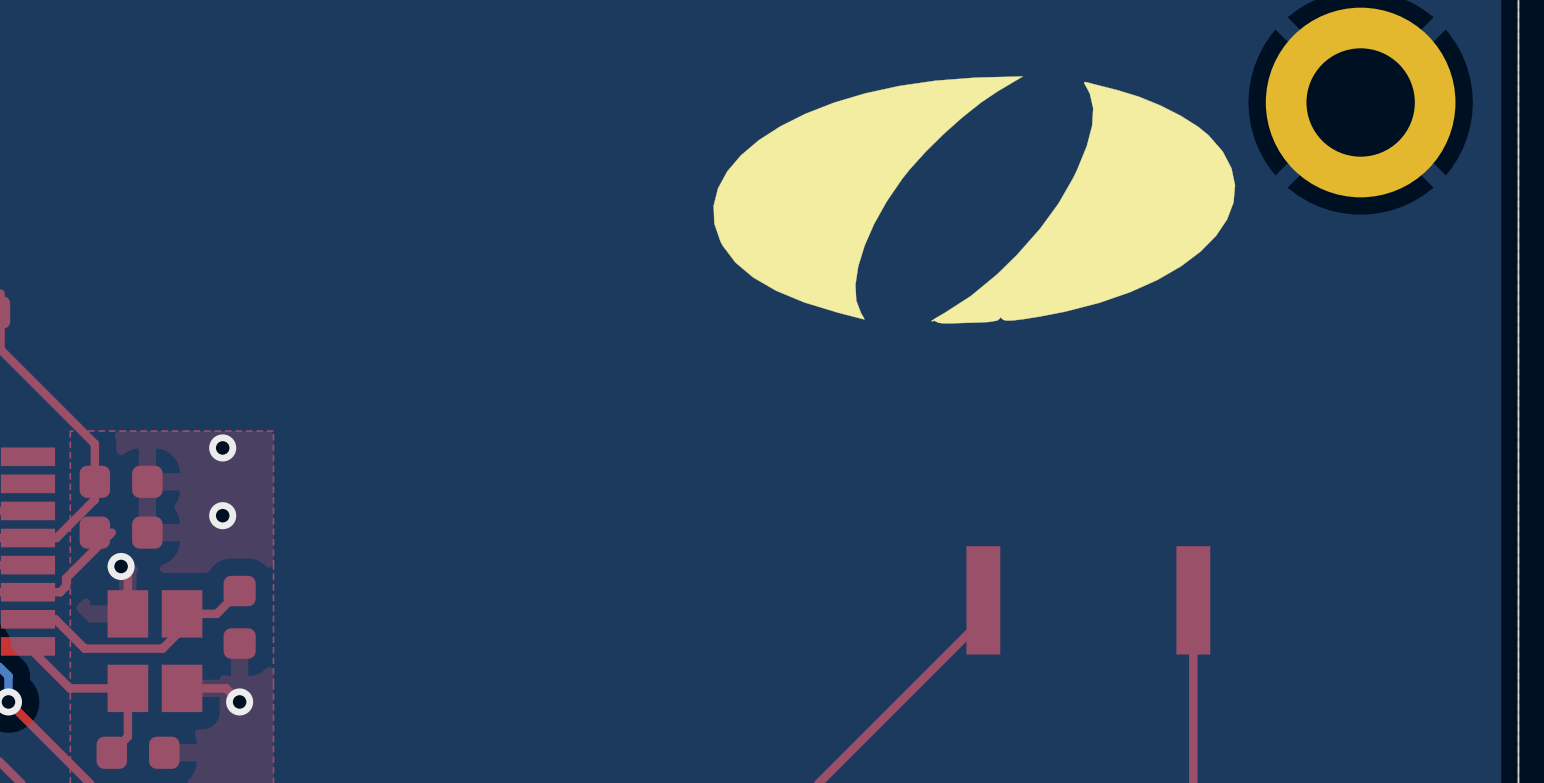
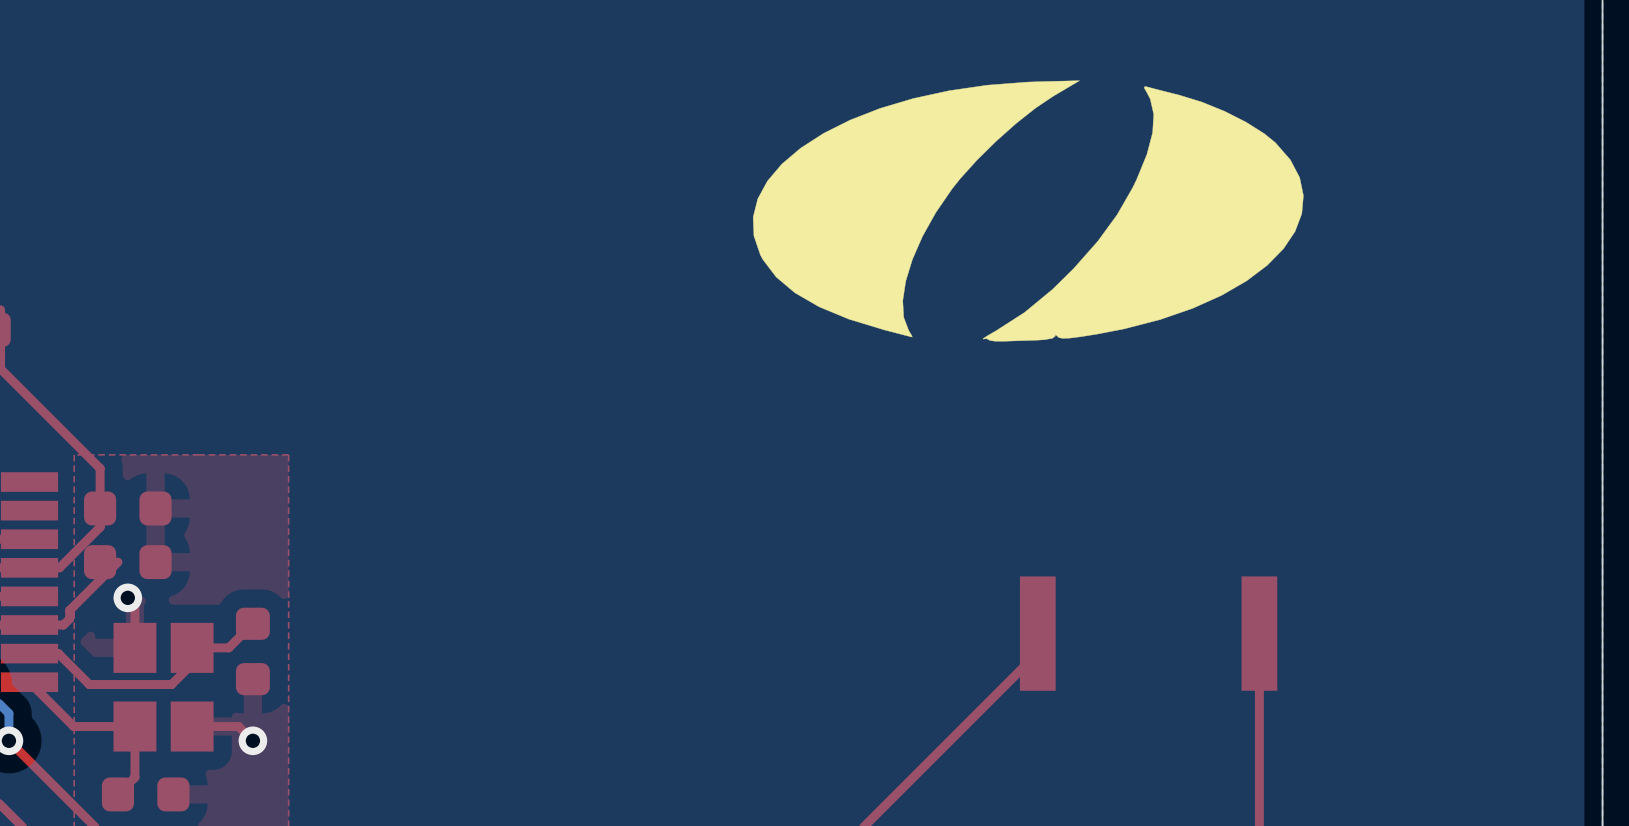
part: (1360, 102) -> none
via: (222, 447) -> none
via: (222, 515) -> none

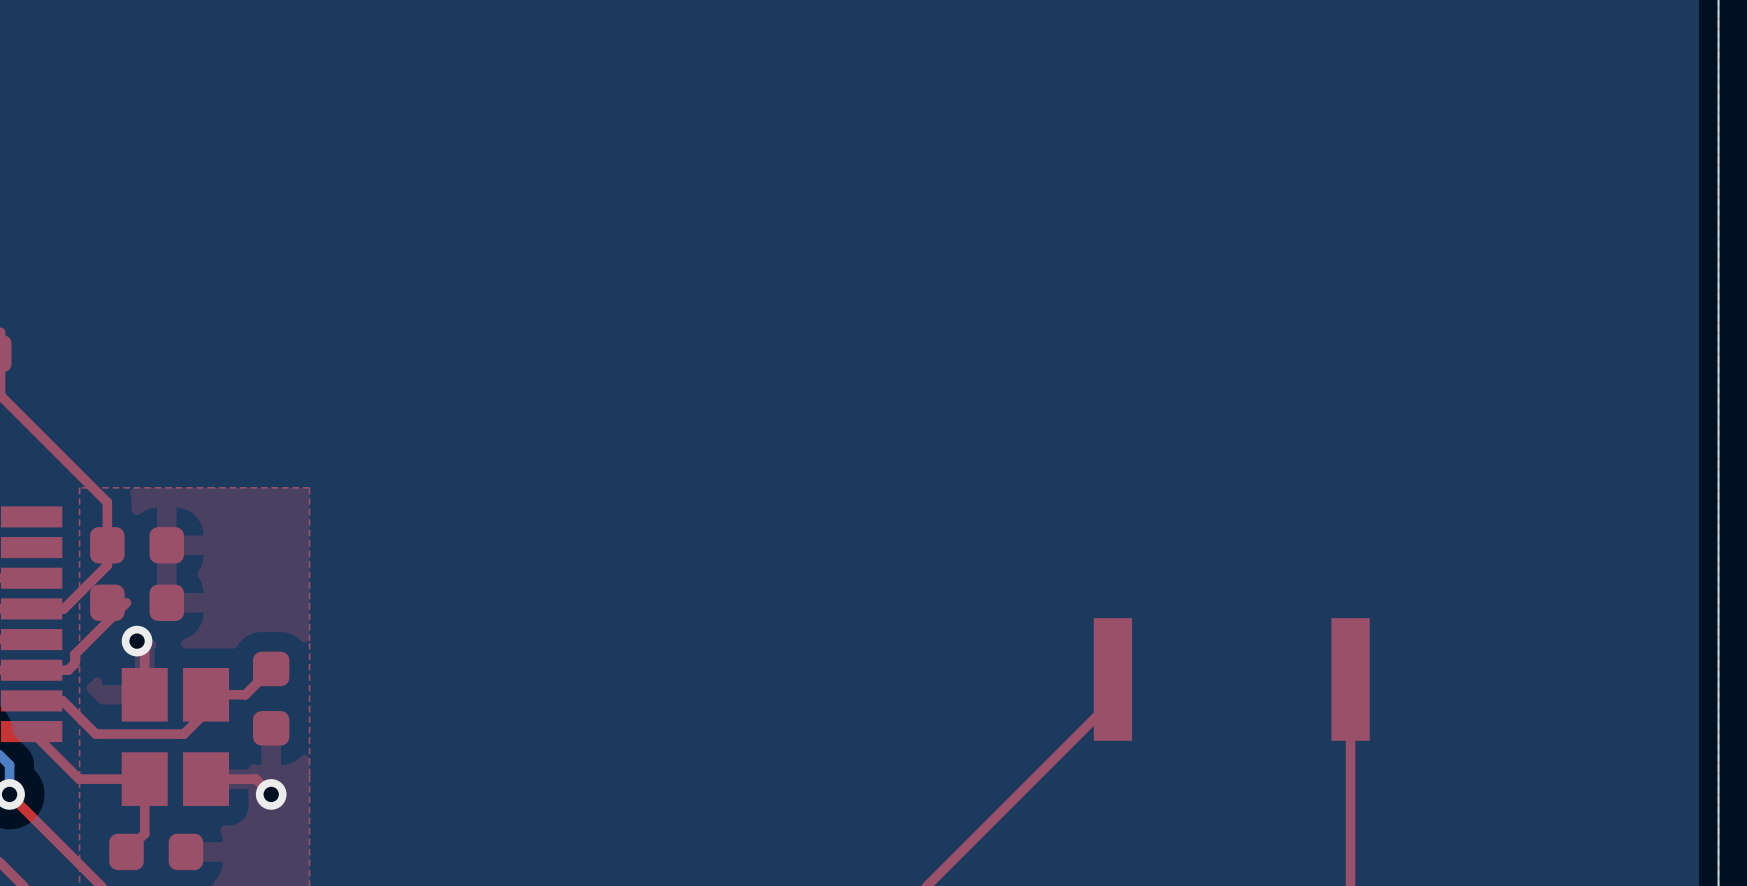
drawing: [752, 80, 1304, 342] -> none

